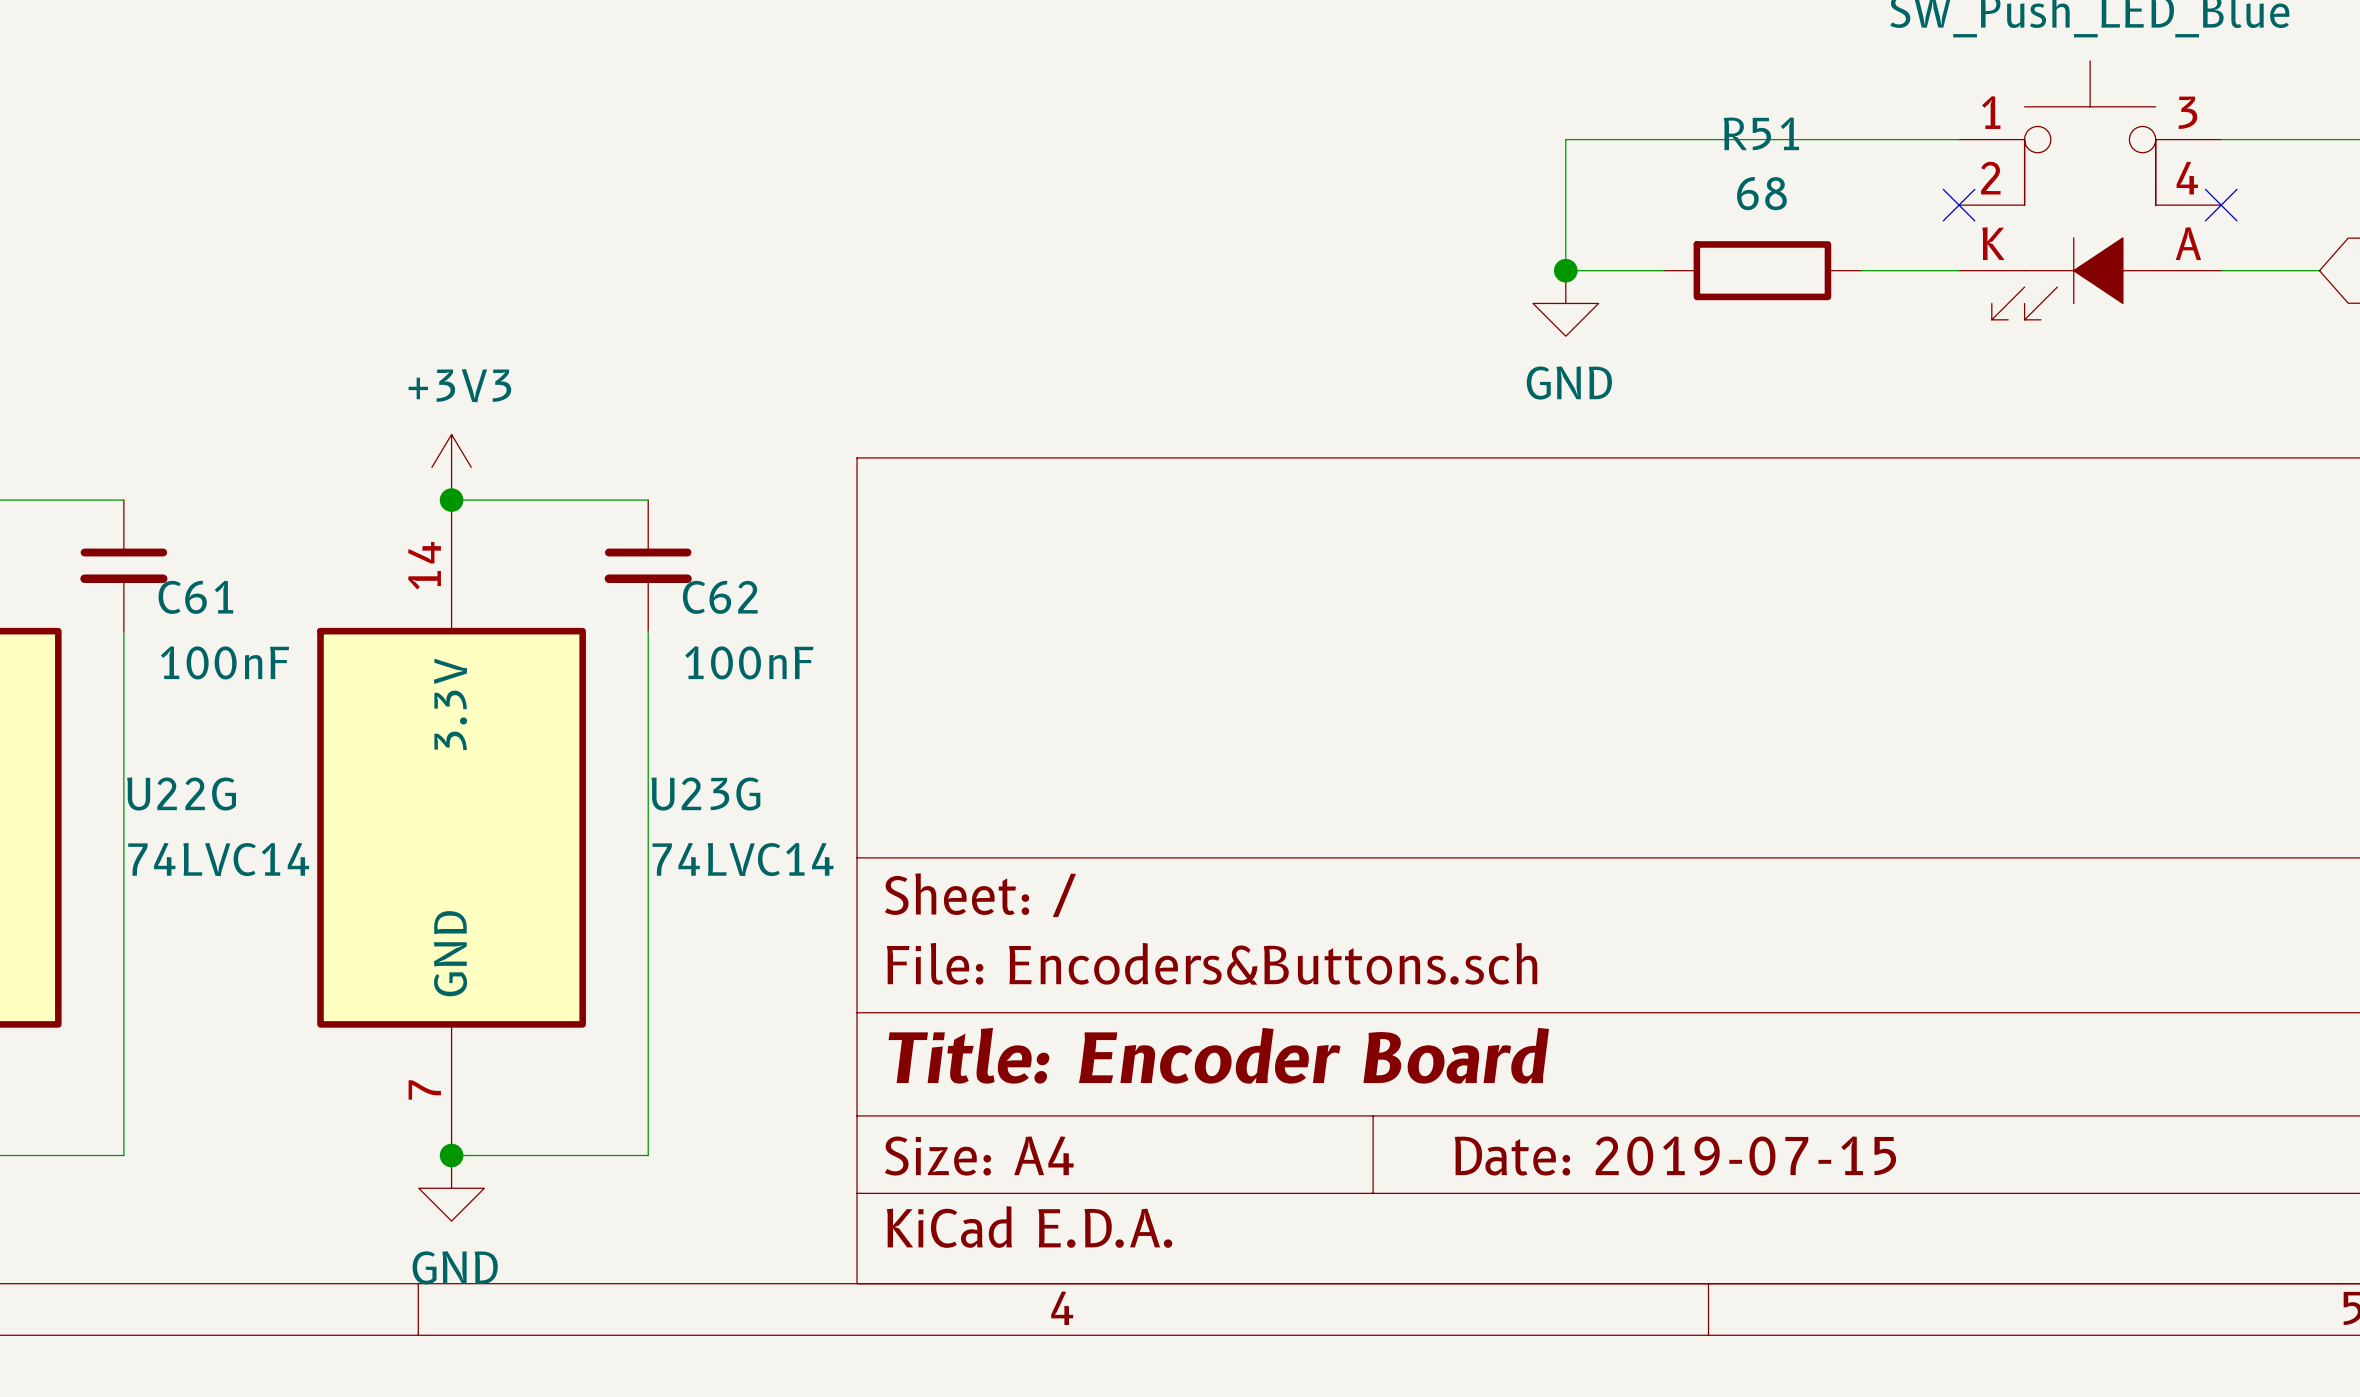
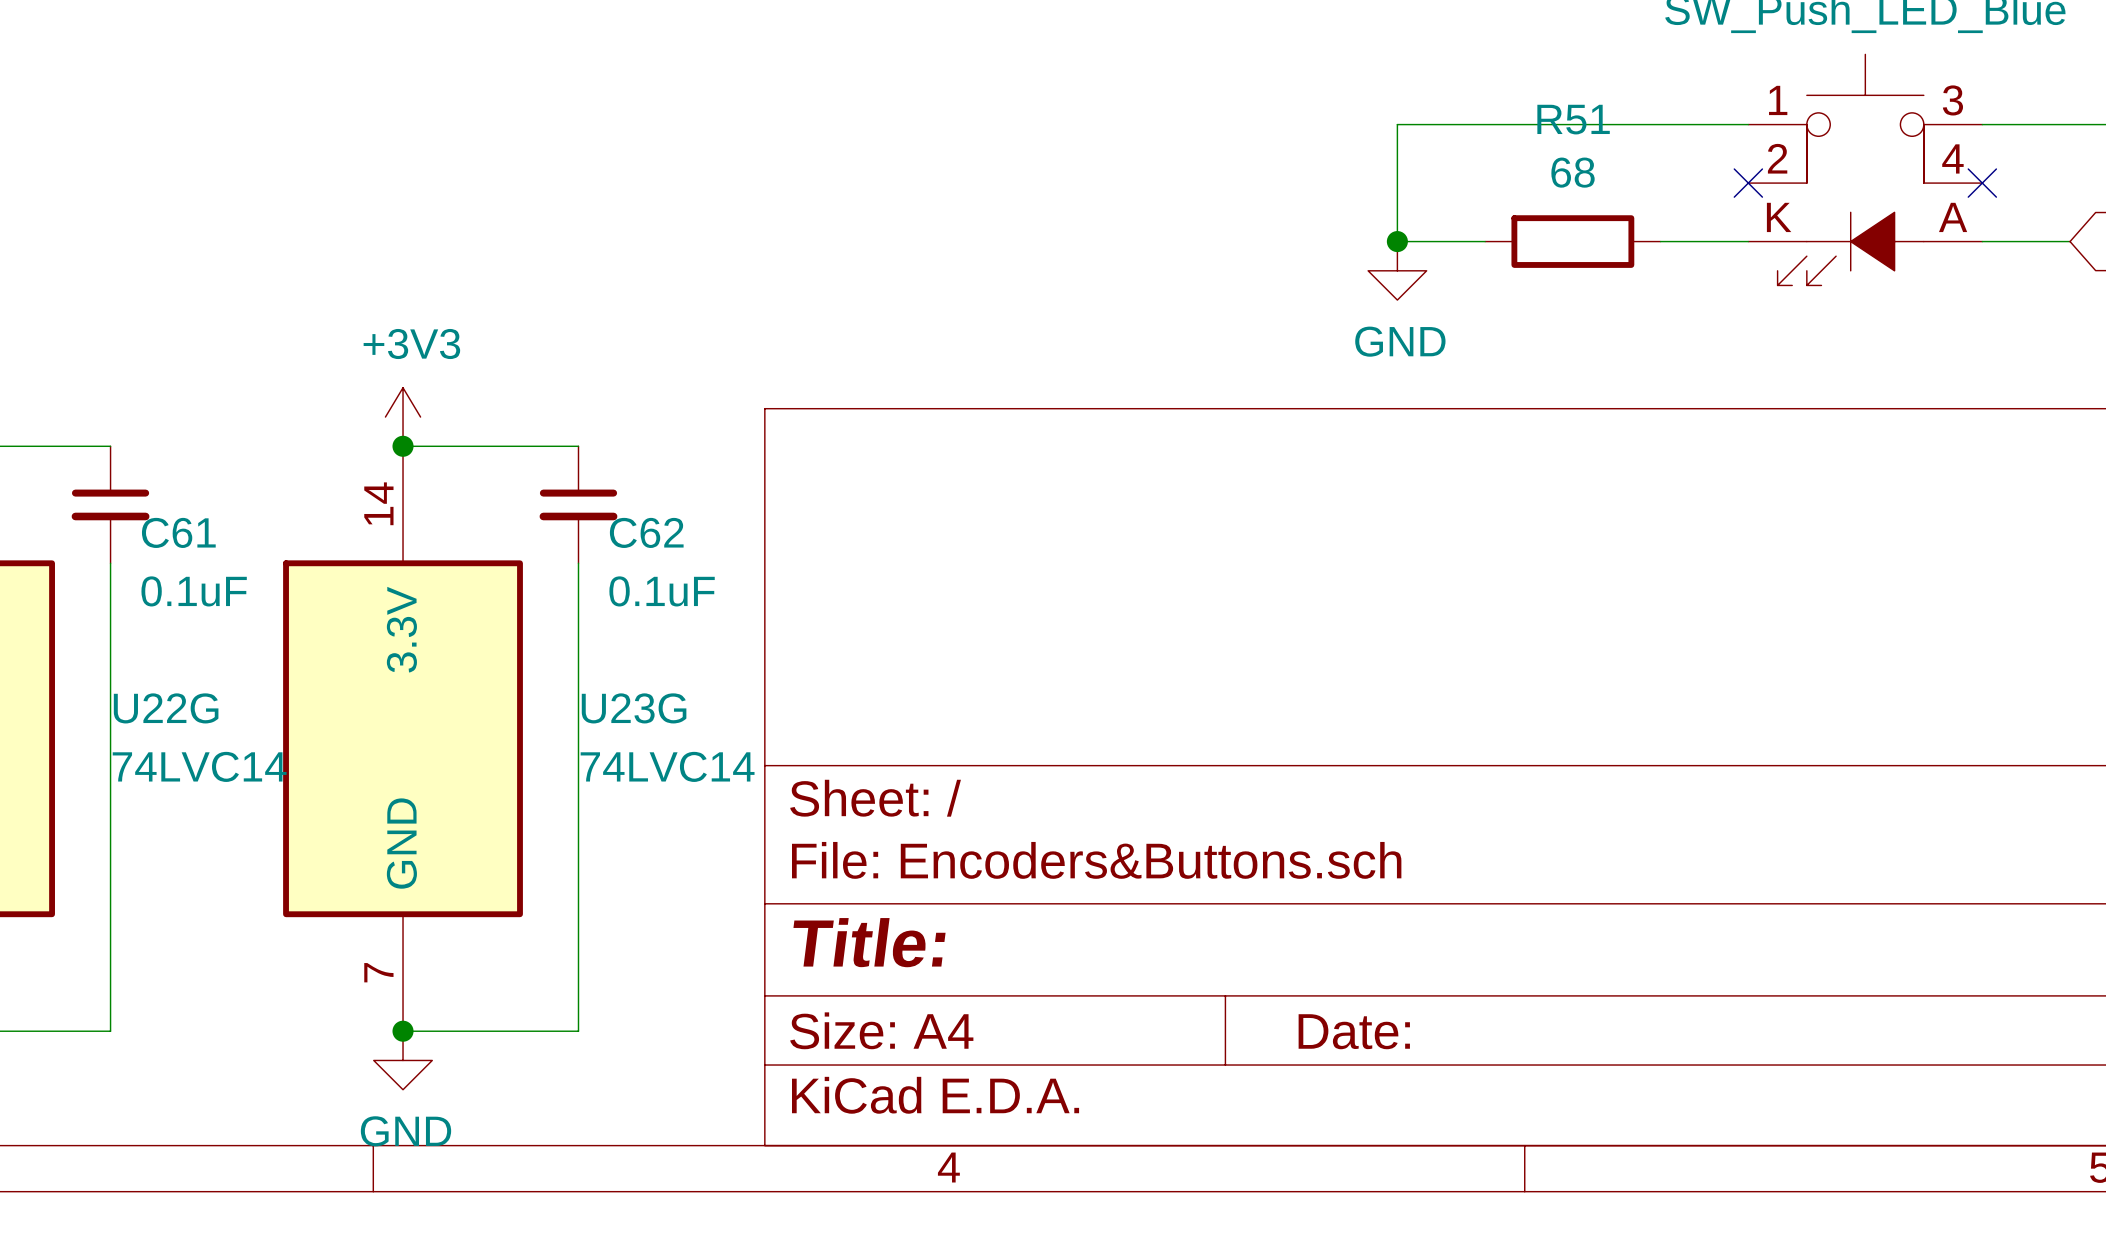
C61 value: 100nF (225, 662) -> 0.1uF (194, 591)
C62 value: 100nF (749, 662) -> 0.1uF (662, 591)
title block: Title: Encoder Board (1218, 1055) -> Title: (869, 942)
title block: Date: 2019-07-15 (1675, 1156) -> Date: (1354, 1031)

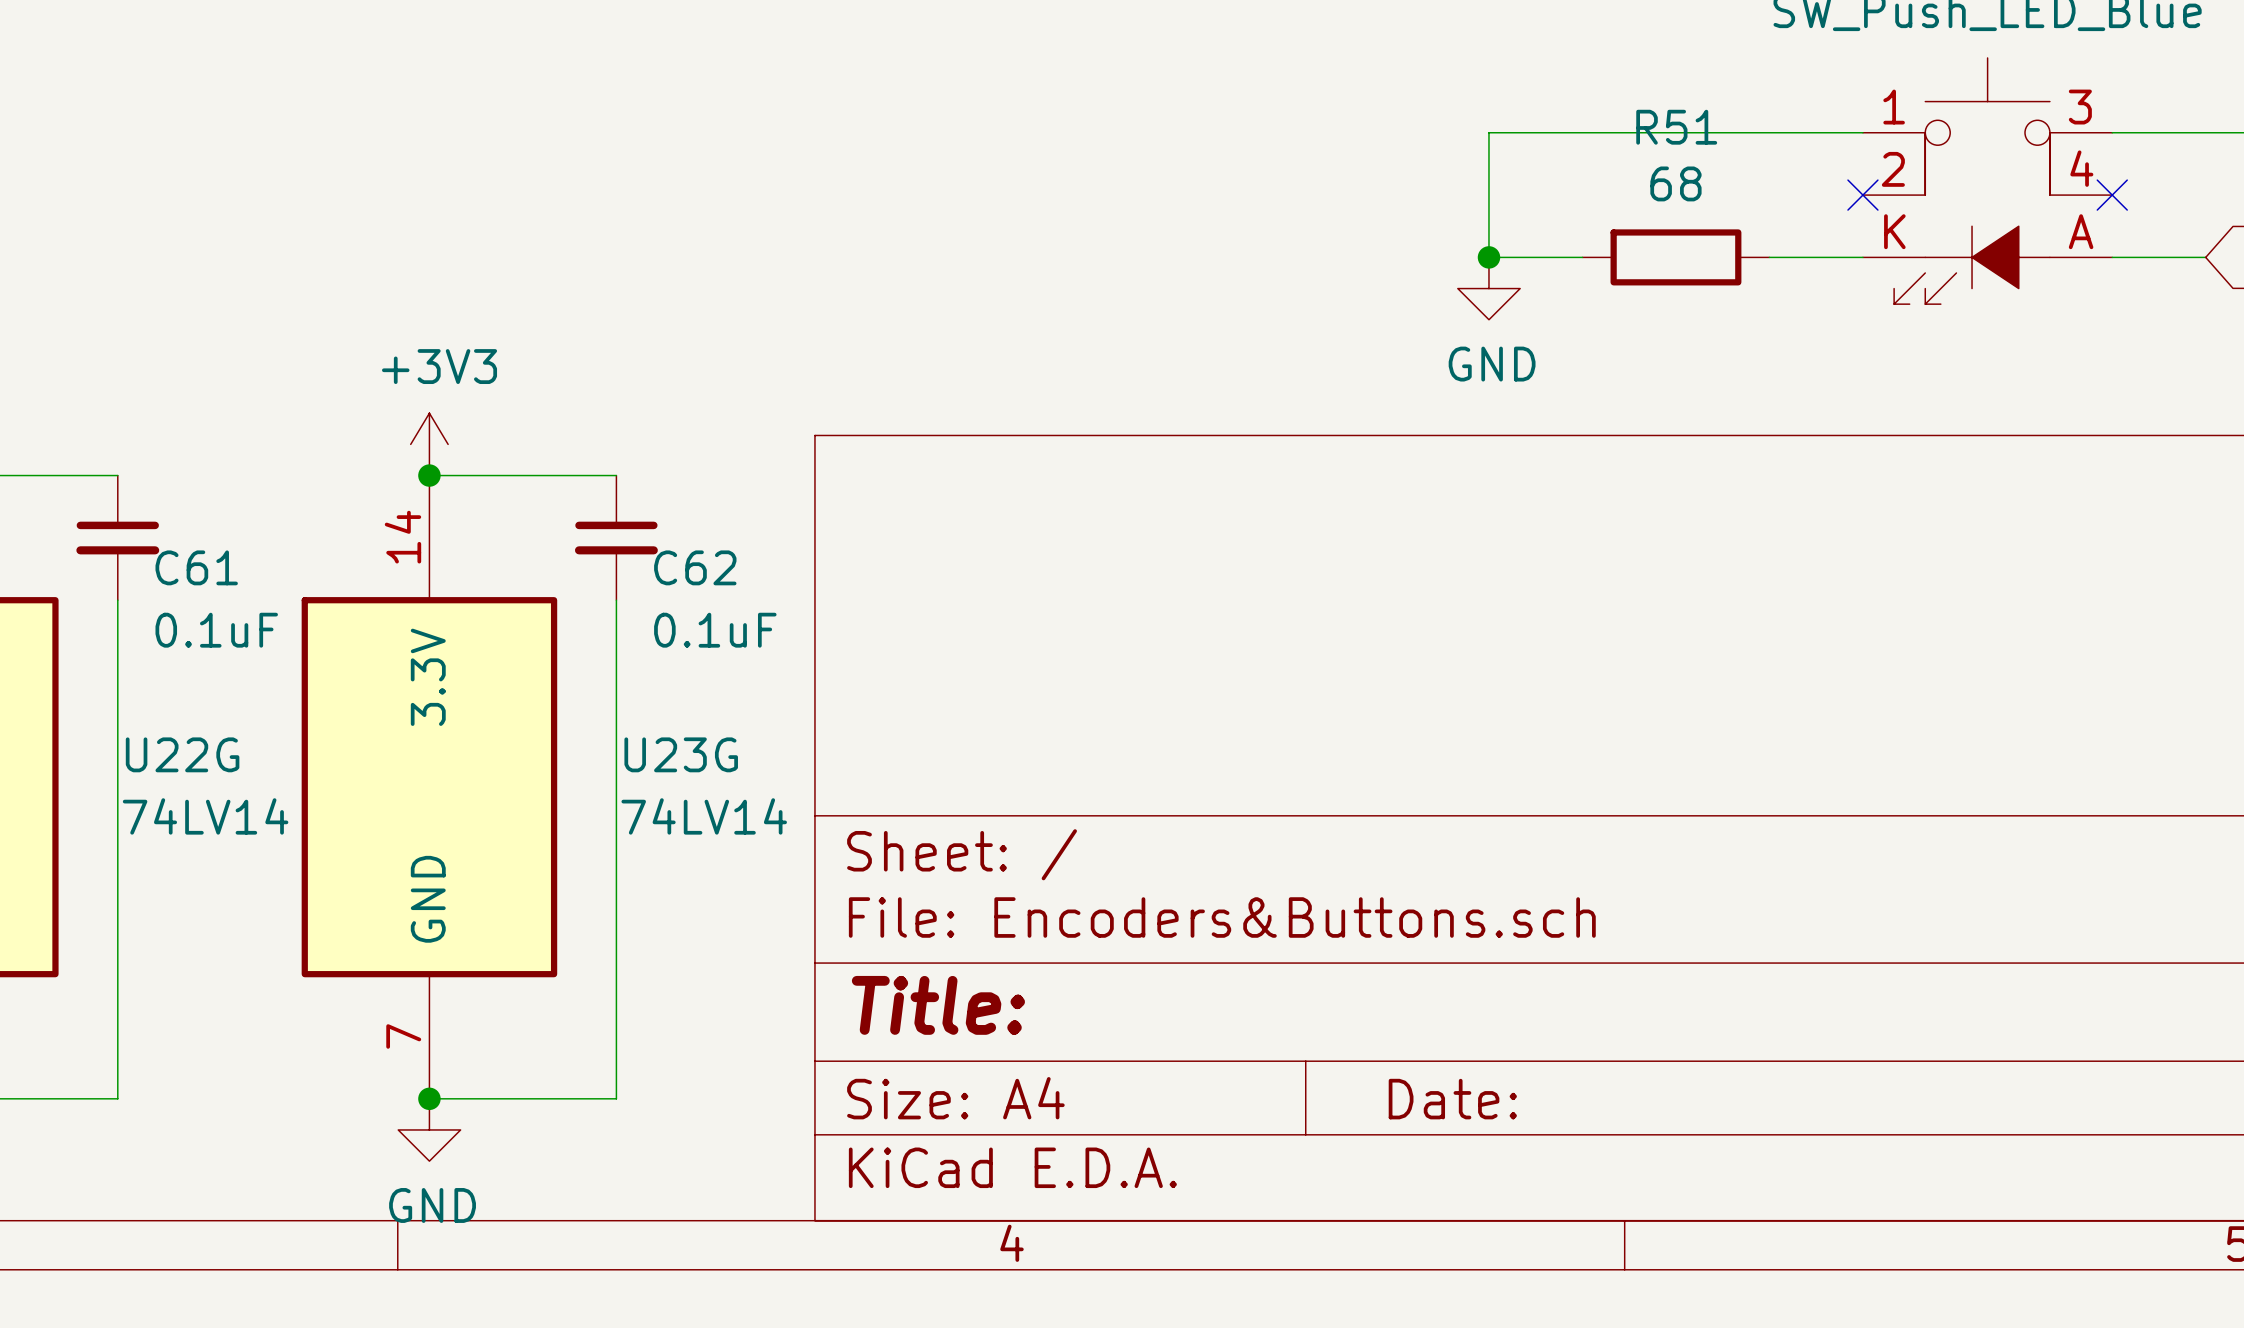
U22G value: 74LVC14 (199, 766) -> 74LV14 (205, 816)
U23G value: 74LVC14 (667, 766) -> 74LV14 (704, 816)

